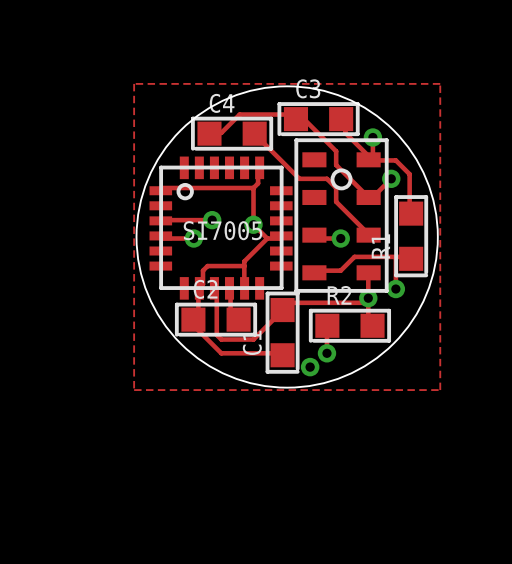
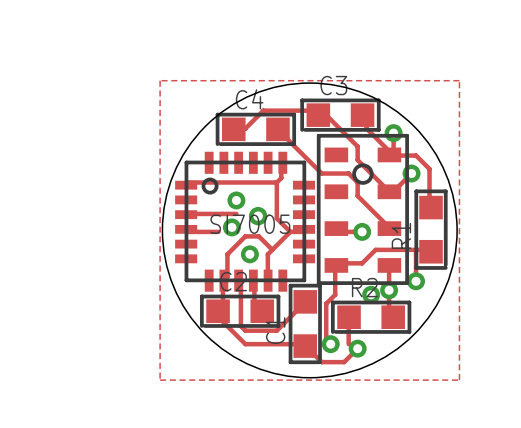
via: none -> (236, 200)
via: (212, 220) -> none
via: (253, 224) -> none
via: none -> (231, 227)
via: (193, 238) -> none
via: none -> (249, 254)
track: (244, 266) (207, 266) (203, 270) -> (272, 249) (258, 236) (245, 236) (227, 254) (227, 263)
track: none -> (336, 265) (335, 294) (326, 303) (326, 339) (330, 344)
via: none -> (371, 294)
track: (368, 302) (290, 302) (282, 310) -> none
via: none -> (330, 344)
via: (326, 353) -> none
track: none -> (305, 346) (321, 362) (344, 362) (357, 348)
via: none -> (357, 348)
via position: (310, 367) -> (258, 216)

